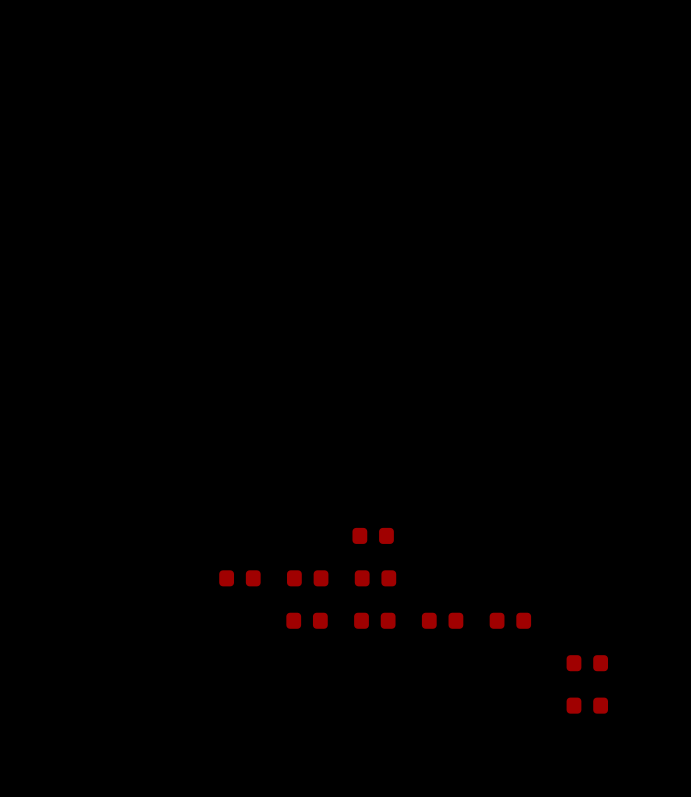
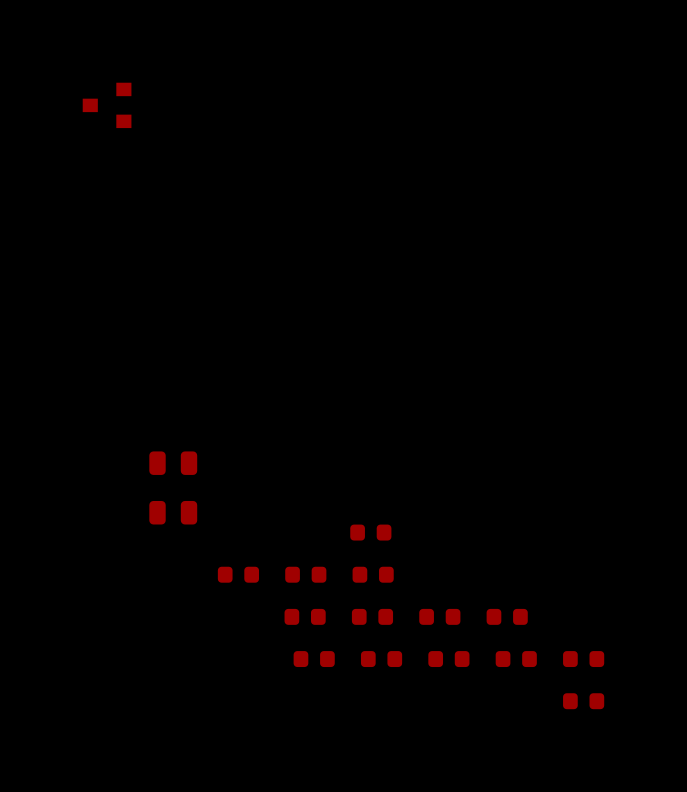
part: none -> (107, 105)
part: none -> (173, 463)
part: none -> (173, 512)
part: none -> (314, 659)
part: none -> (381, 659)
part: none -> (448, 659)
part: none -> (516, 659)

